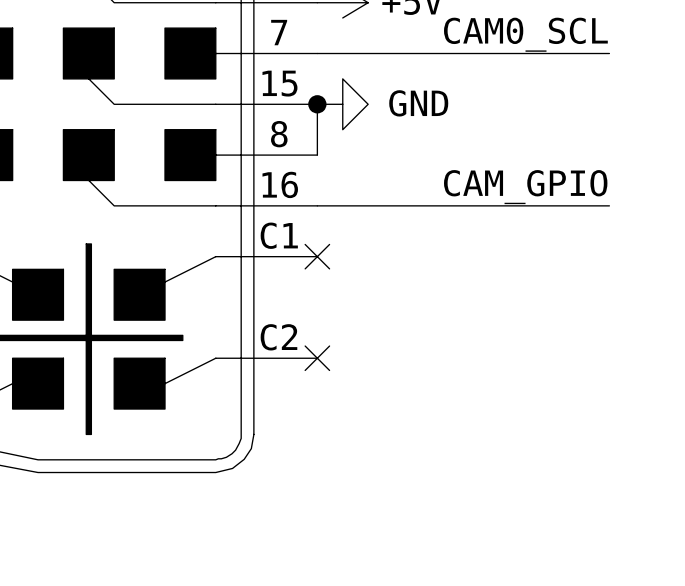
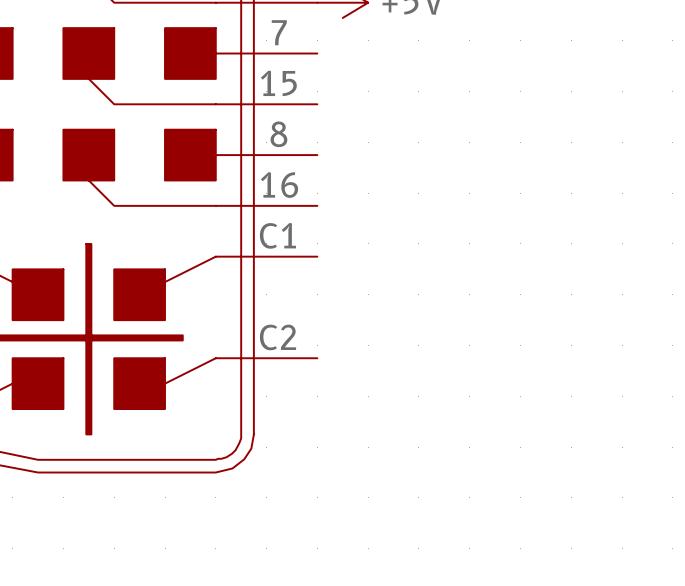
label: CAM0_SCL (525, 34) -> none
wire: (317, 53) (609, 53) -> none
wire: (317, 104) (317, 155) -> none
junction: (317, 104) -> none
power symbol: GND (342, 104) -> none
label: CAM_GPIO (525, 187) -> none
wire: (317, 205) (609, 205) -> none
no-connect mark: (317, 256) -> none
no-connect mark: (317, 358) -> none

